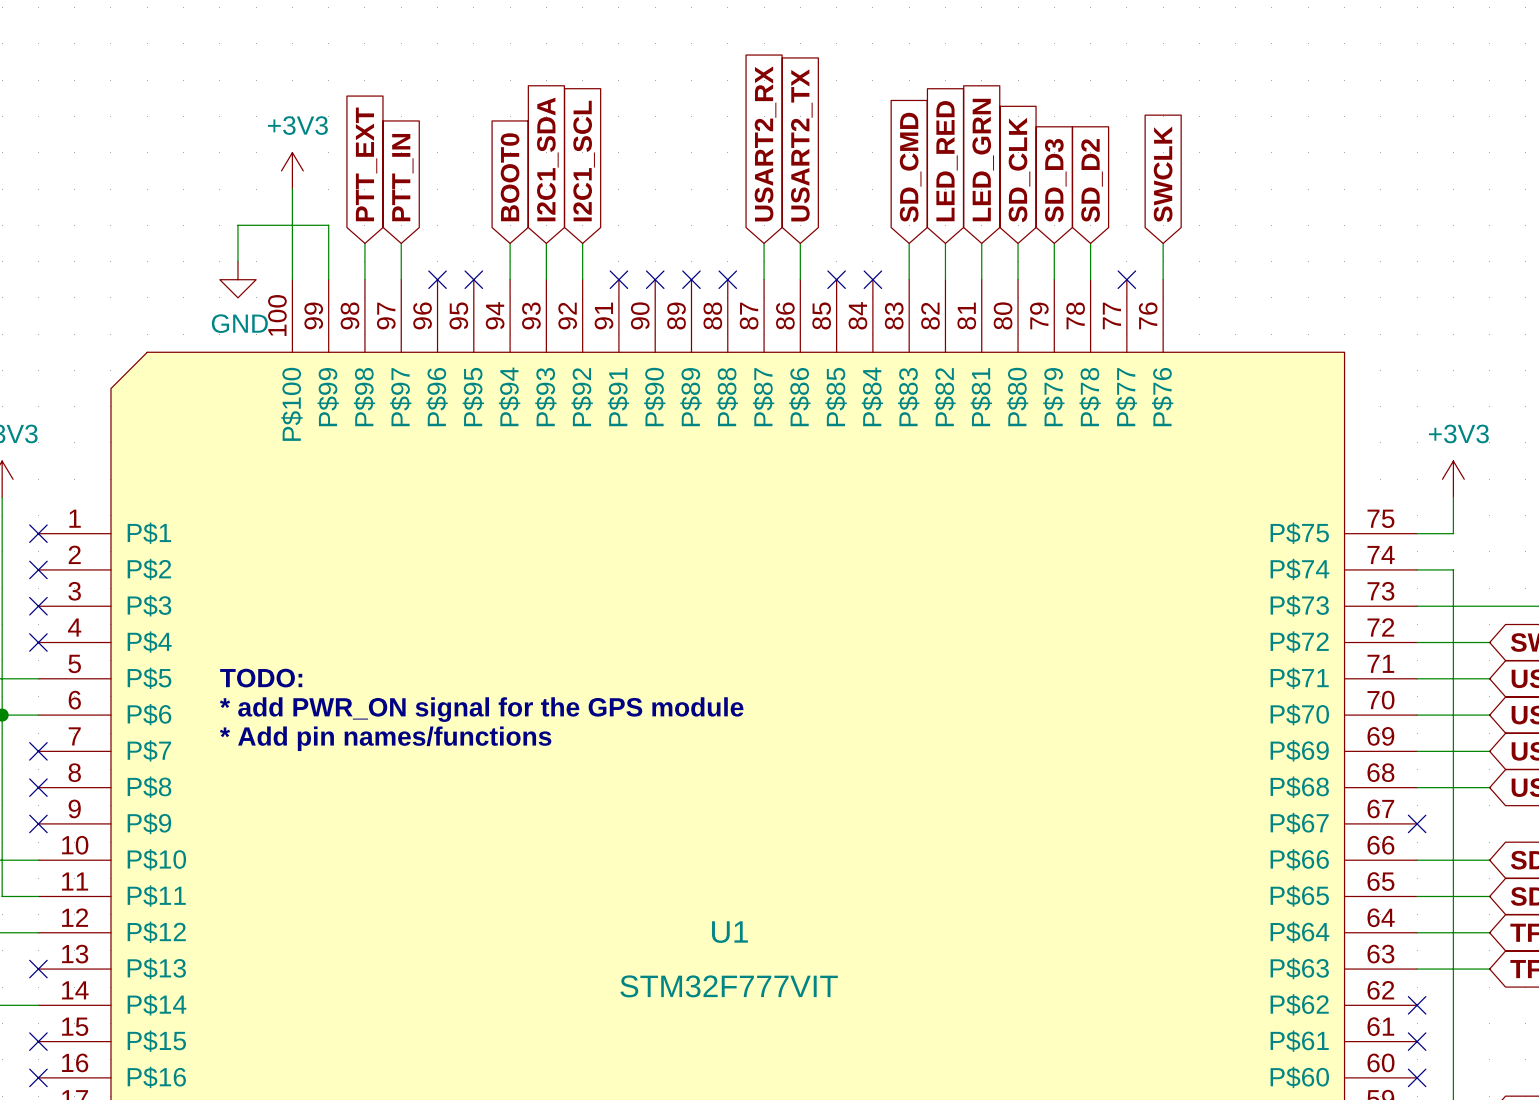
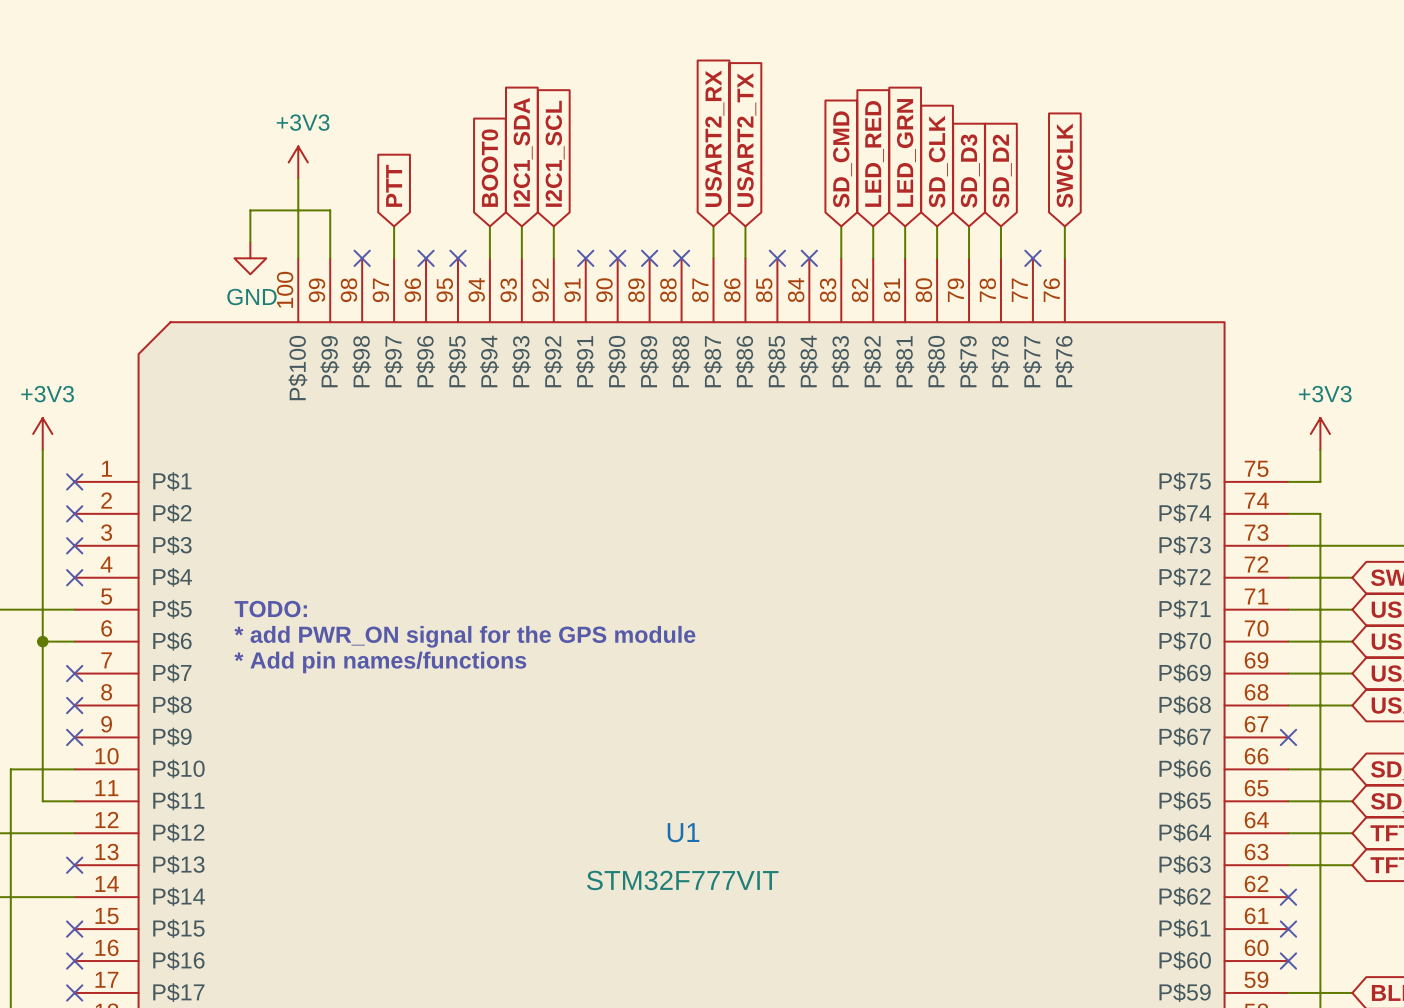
global label: PTT_EXT (366, 164) -> none
global label: PTT_IN (402, 177) -> PTT (394, 185)
wire: (364, 243) (364, 279) -> none
no-connect mark: none -> (362, 258)

